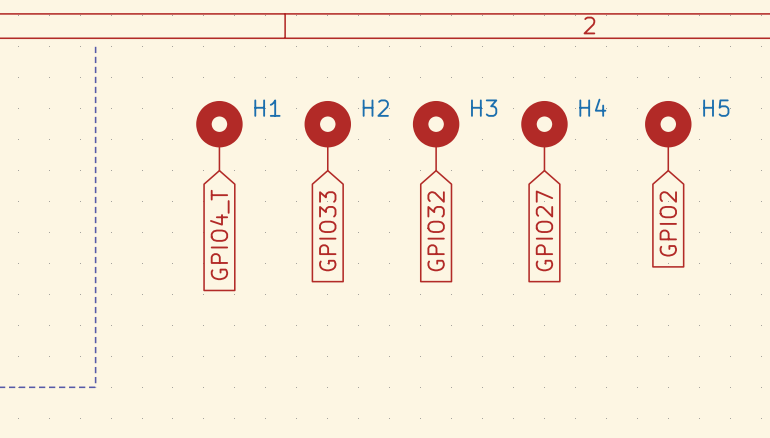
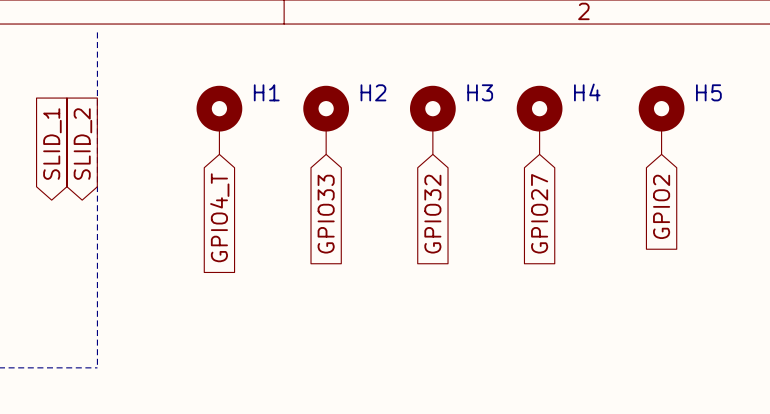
global label: none -> SLID_1 (52, 144)
global label: none -> SLID_2 (82, 144)

